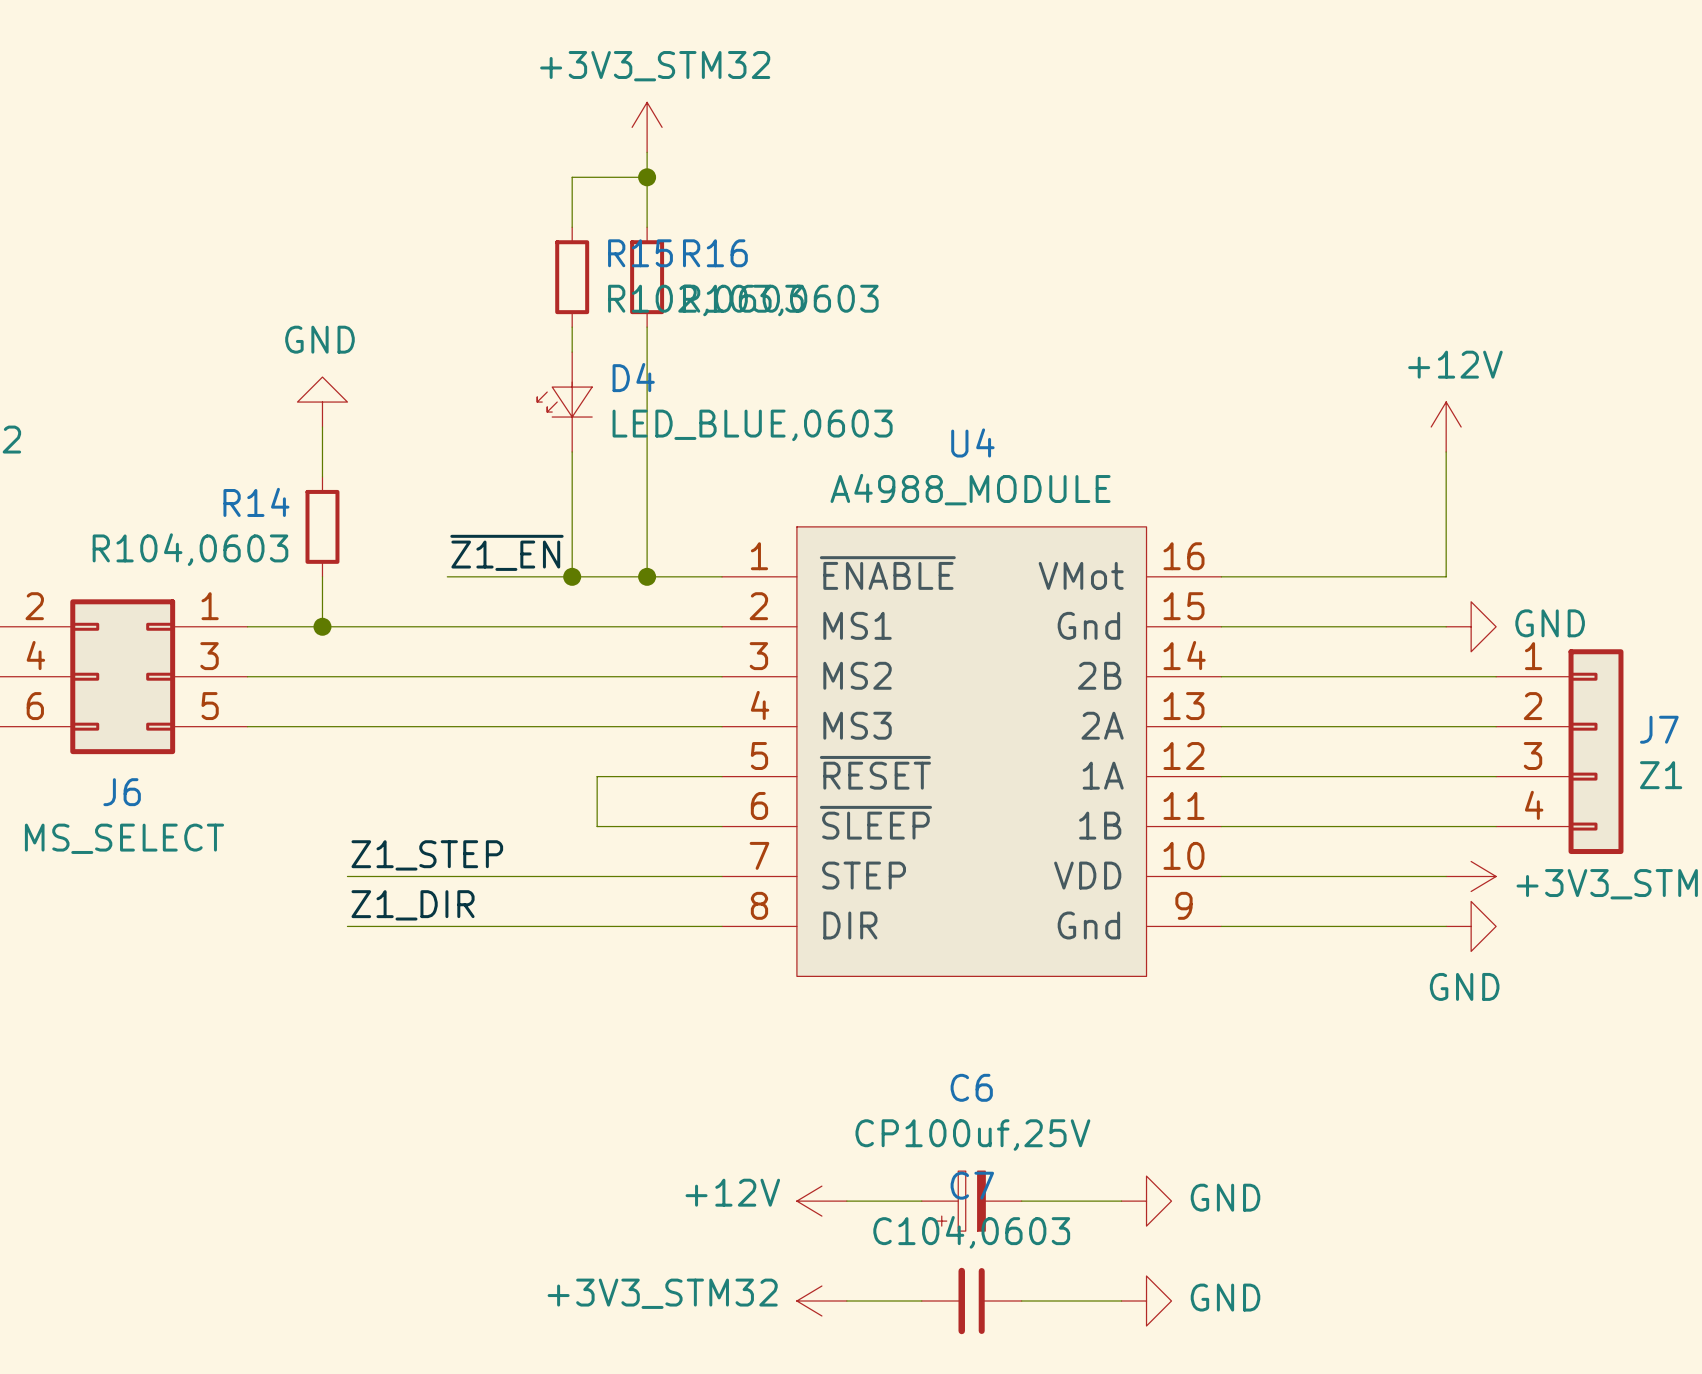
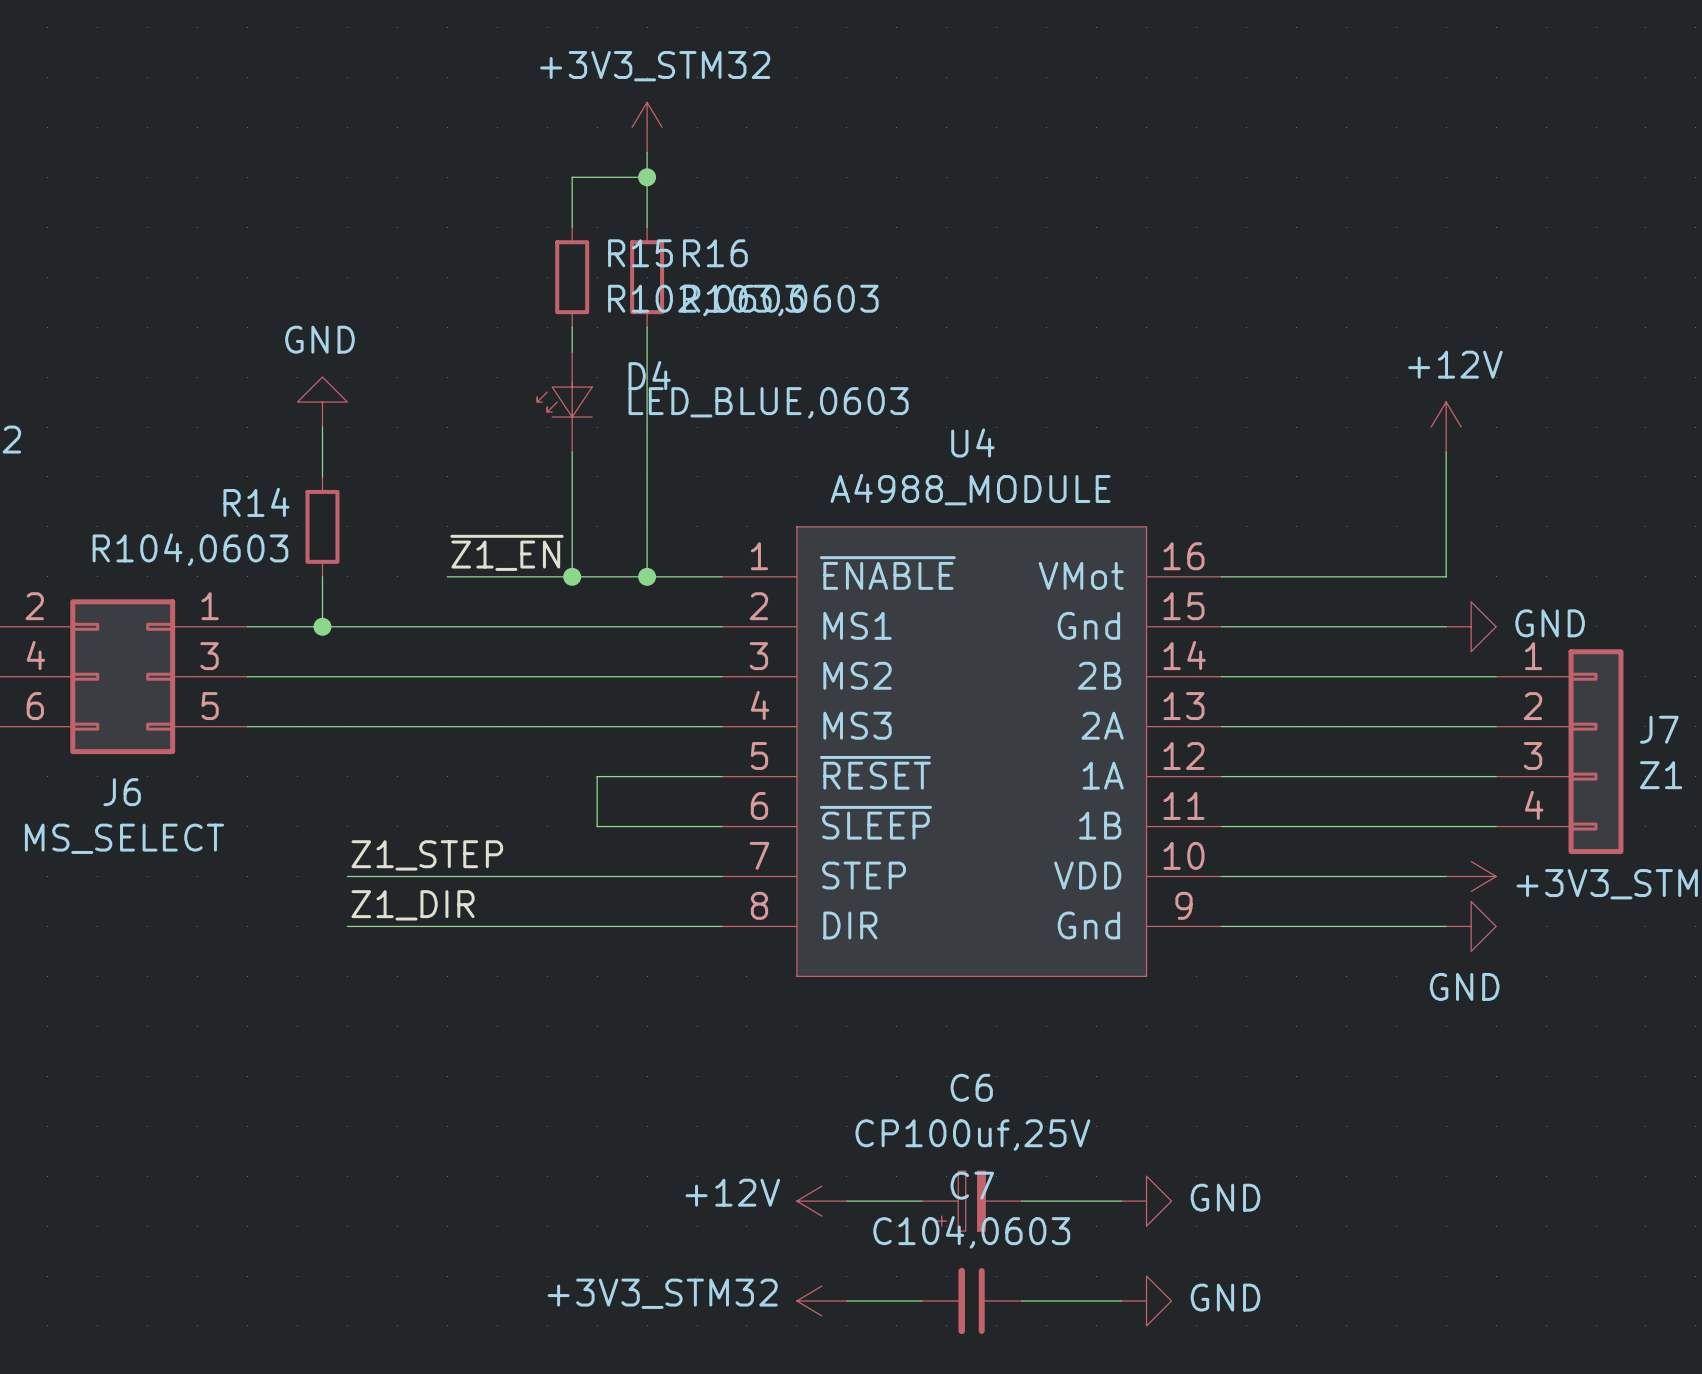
D4 name position: D4 (633, 377) -> D4 (649, 375)
D4 value position: LED_BLUE,0603 (752, 425) -> LED_BLUE,0603 (768, 402)

